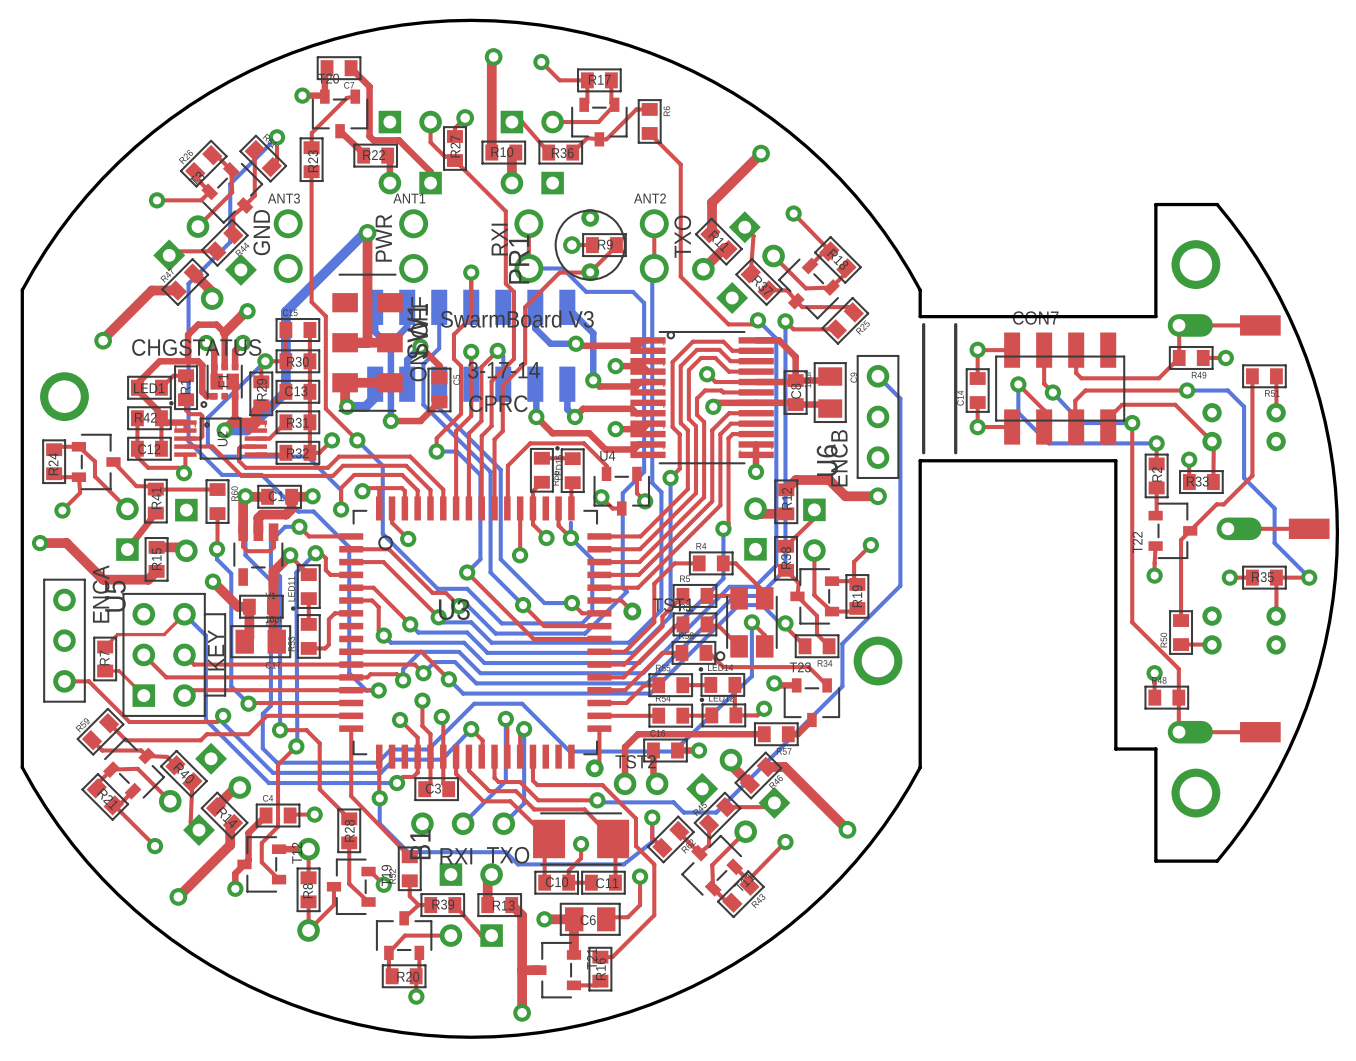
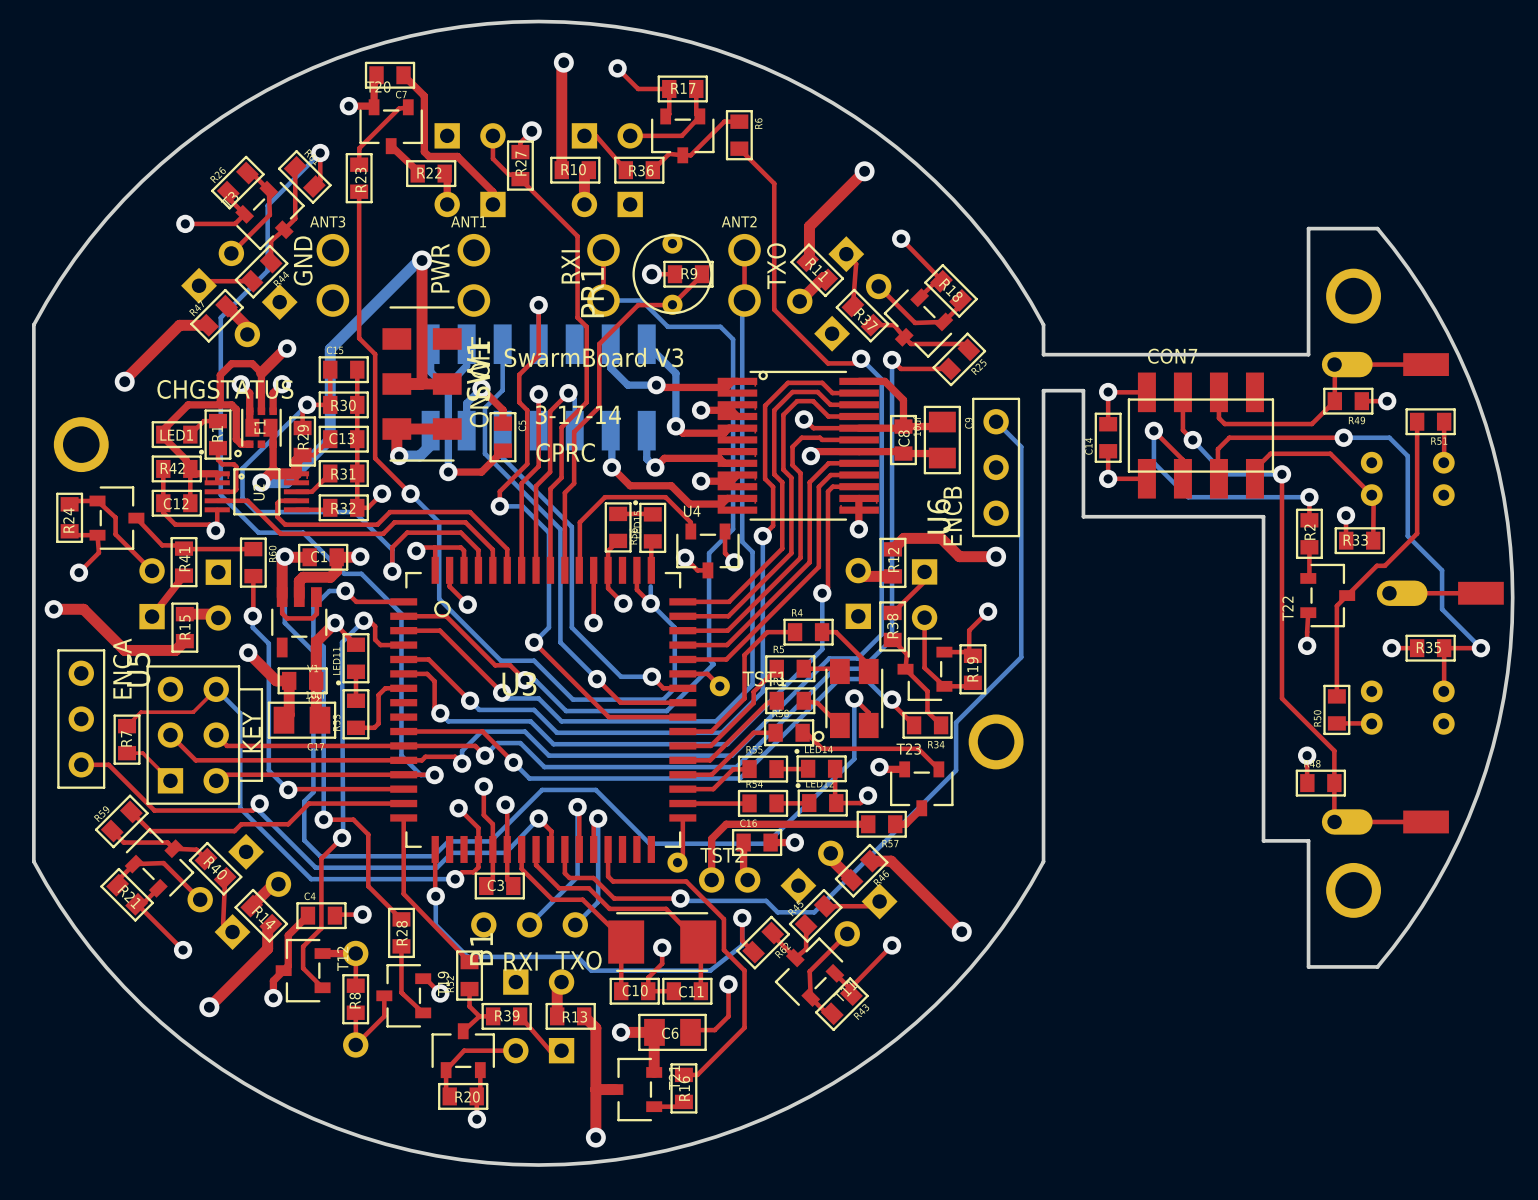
line: (923, 324) (923, 452) -> none
line: (955, 324) (955, 452) -> none
board edge: (920, 460) (955, 460) -> (1043, 516) (1043, 390) (1083, 390) (1083, 516)

